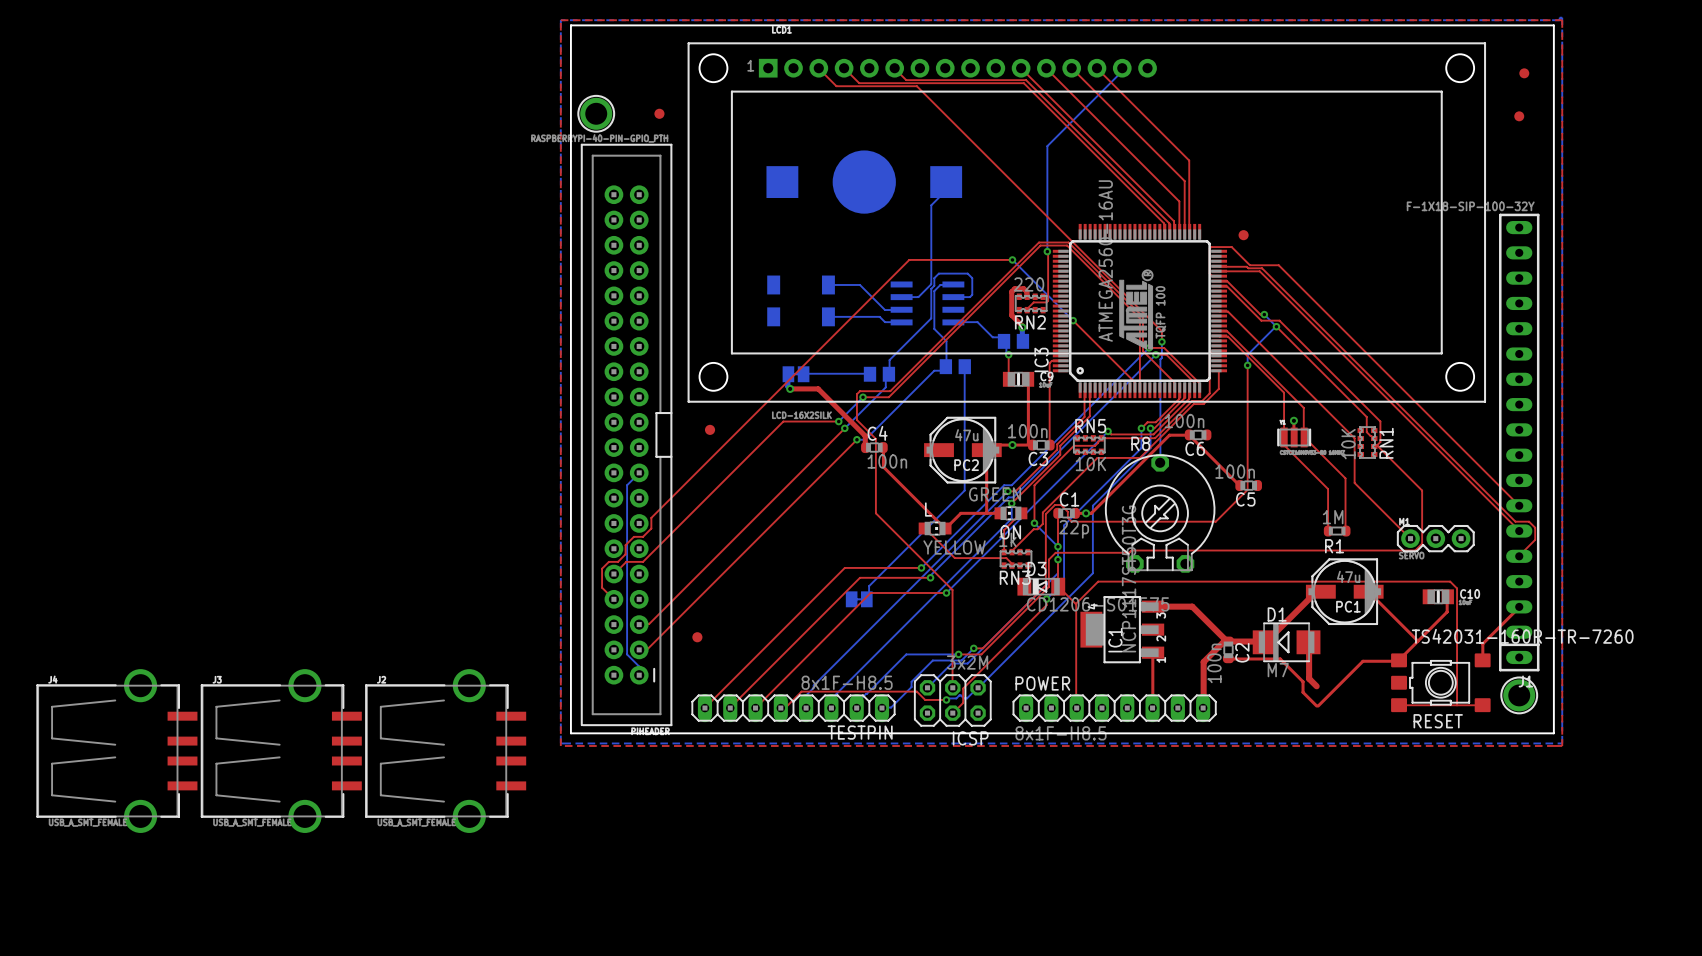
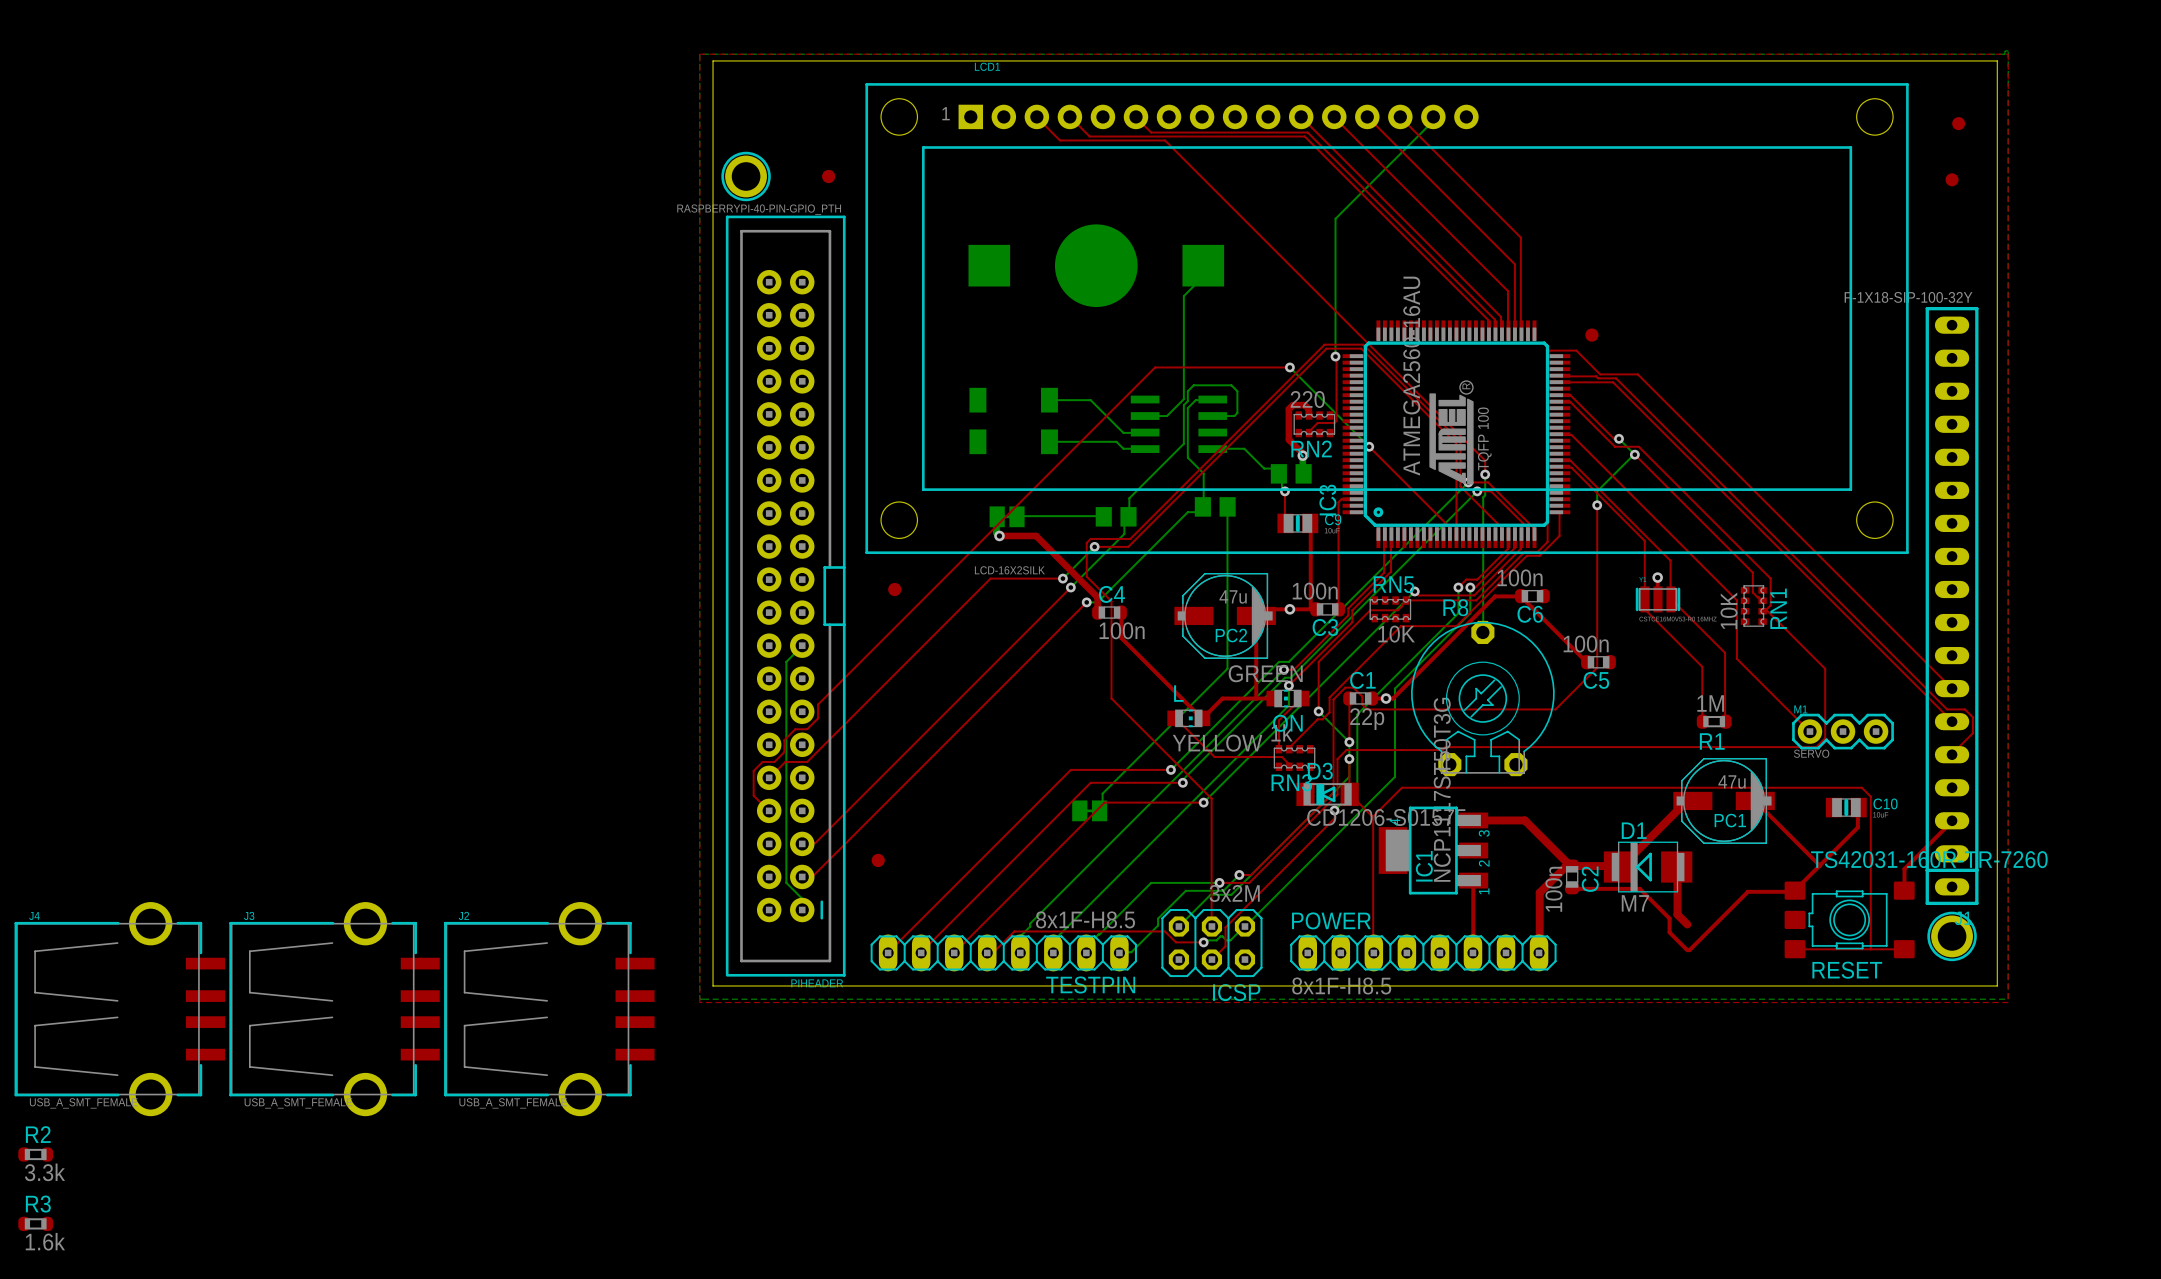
R2: none -> 3.3k (35, 1154)
R3: none -> 1.6k (35, 1223)

